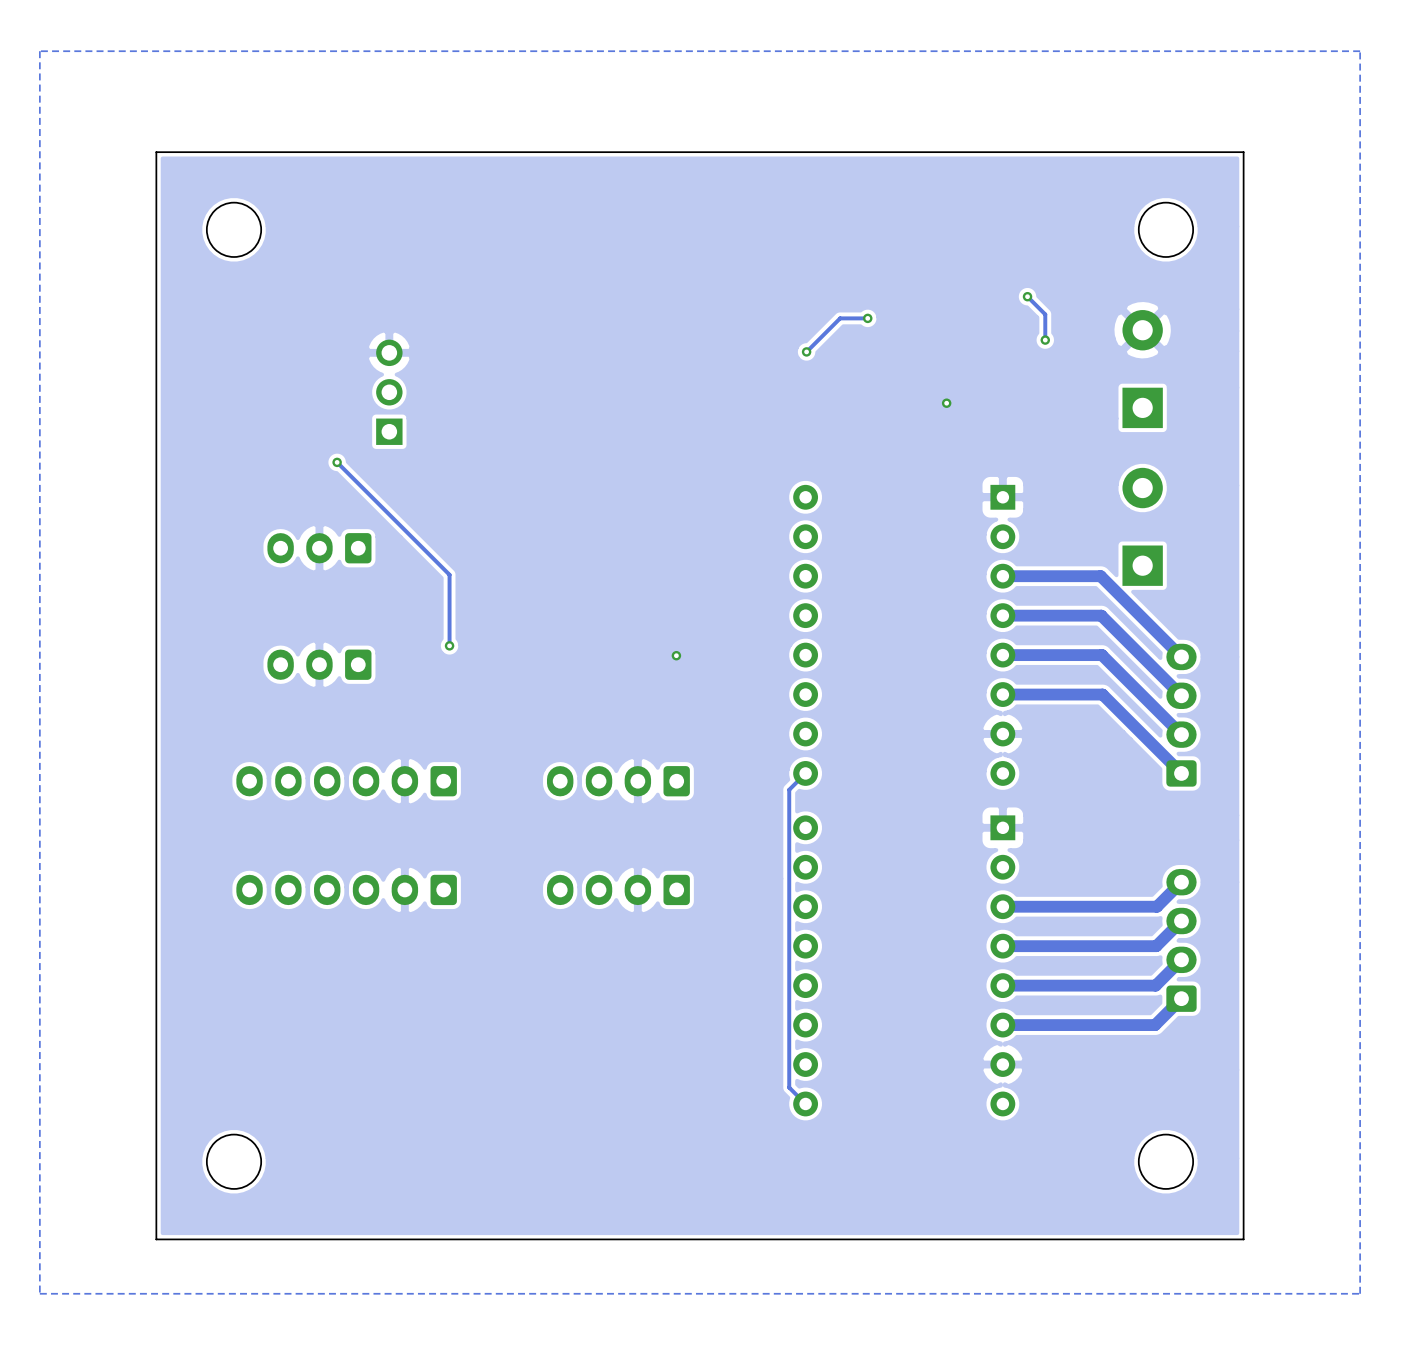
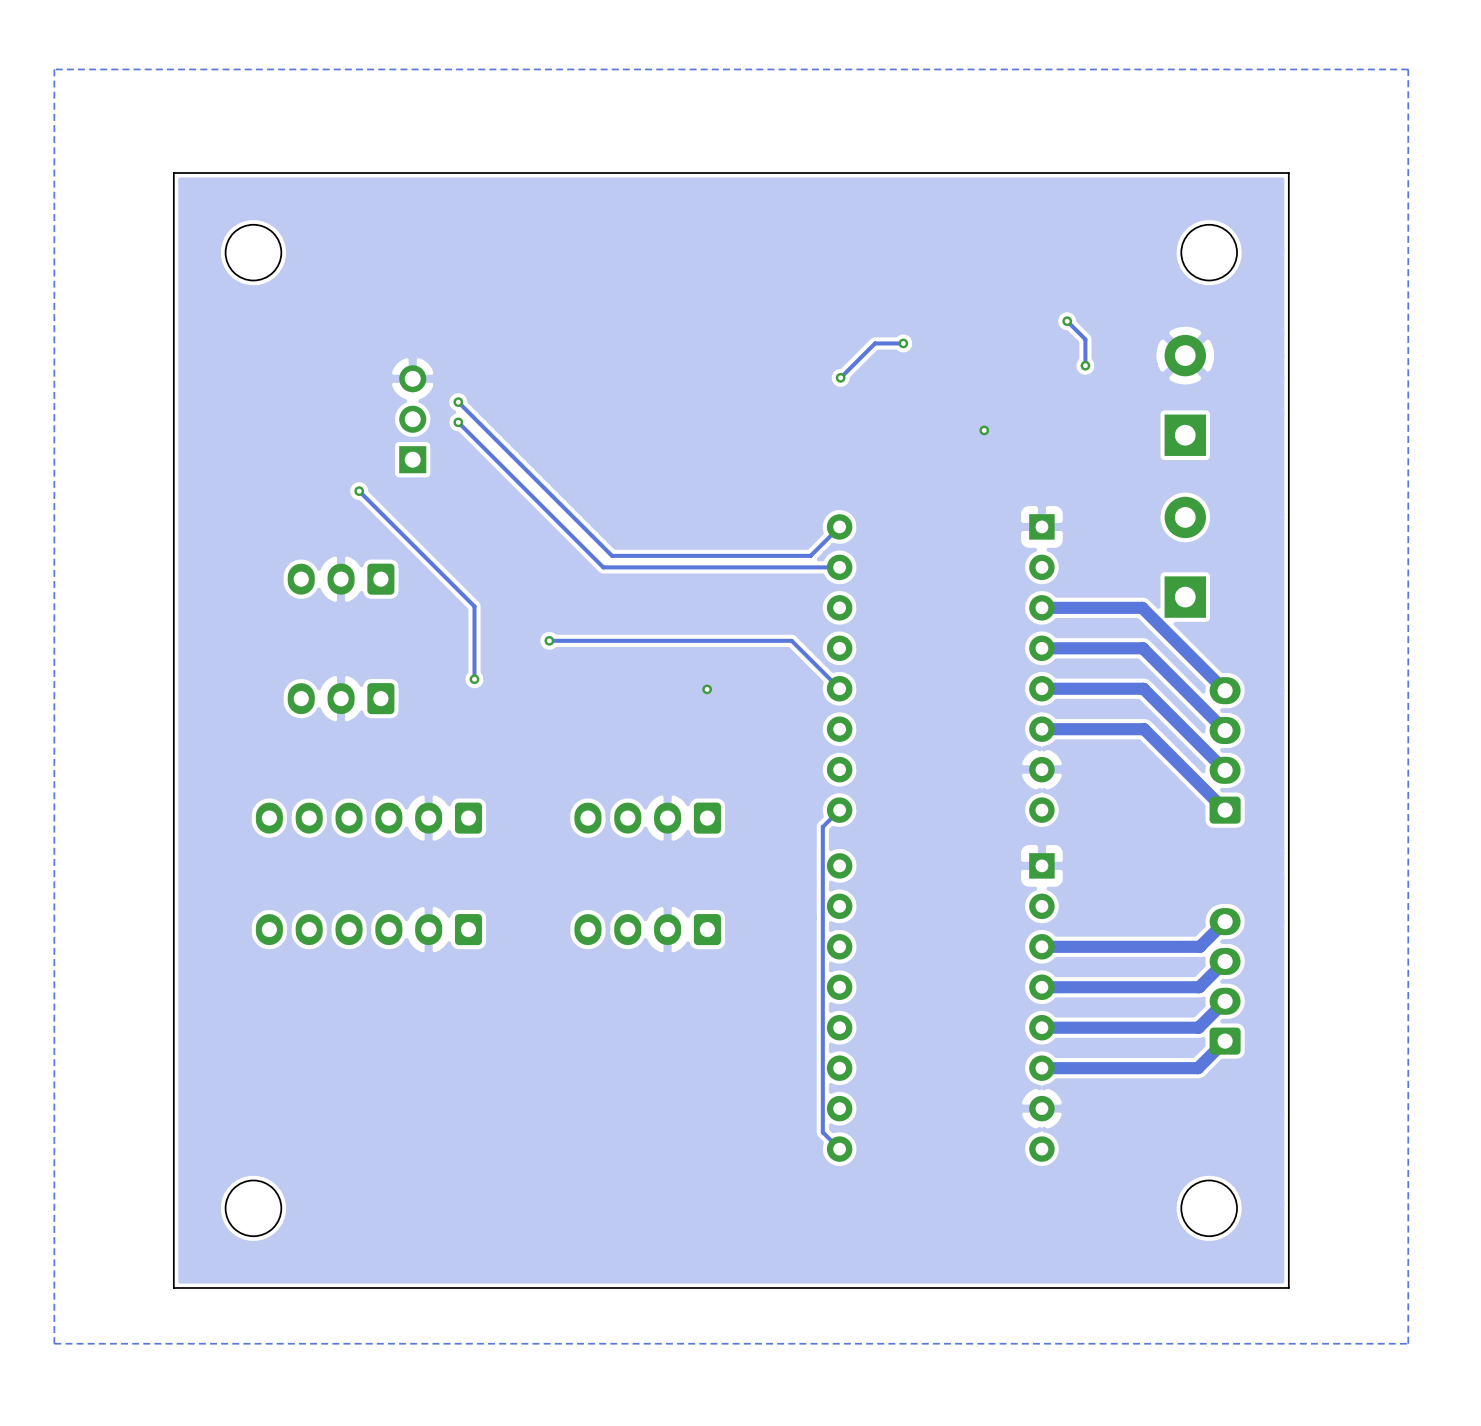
track: none -> (458, 402) (612, 555) (810, 555) (839, 526)
via: none -> (458, 402)
track: none -> (458, 422) (603, 567) (839, 567)
via: none -> (458, 422)
track: none -> (549, 640) (791, 640) (839, 688)
via: none -> (549, 640)

